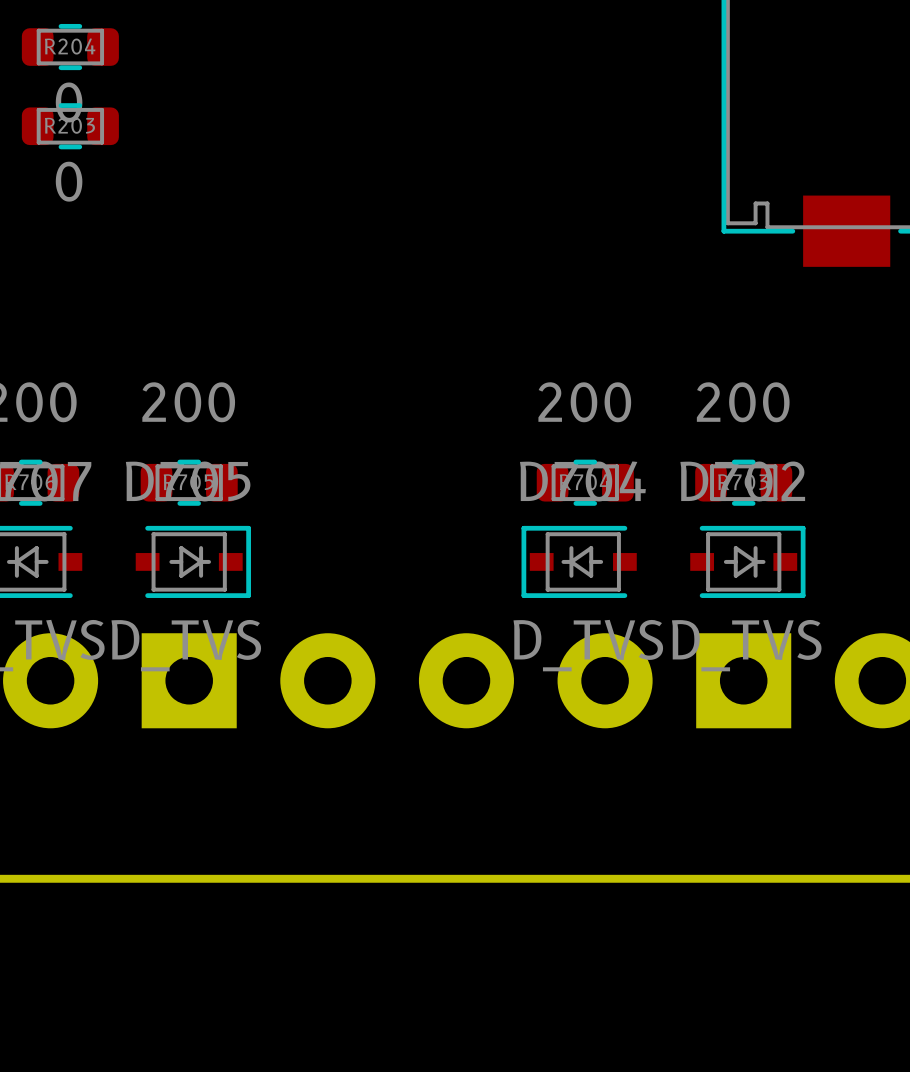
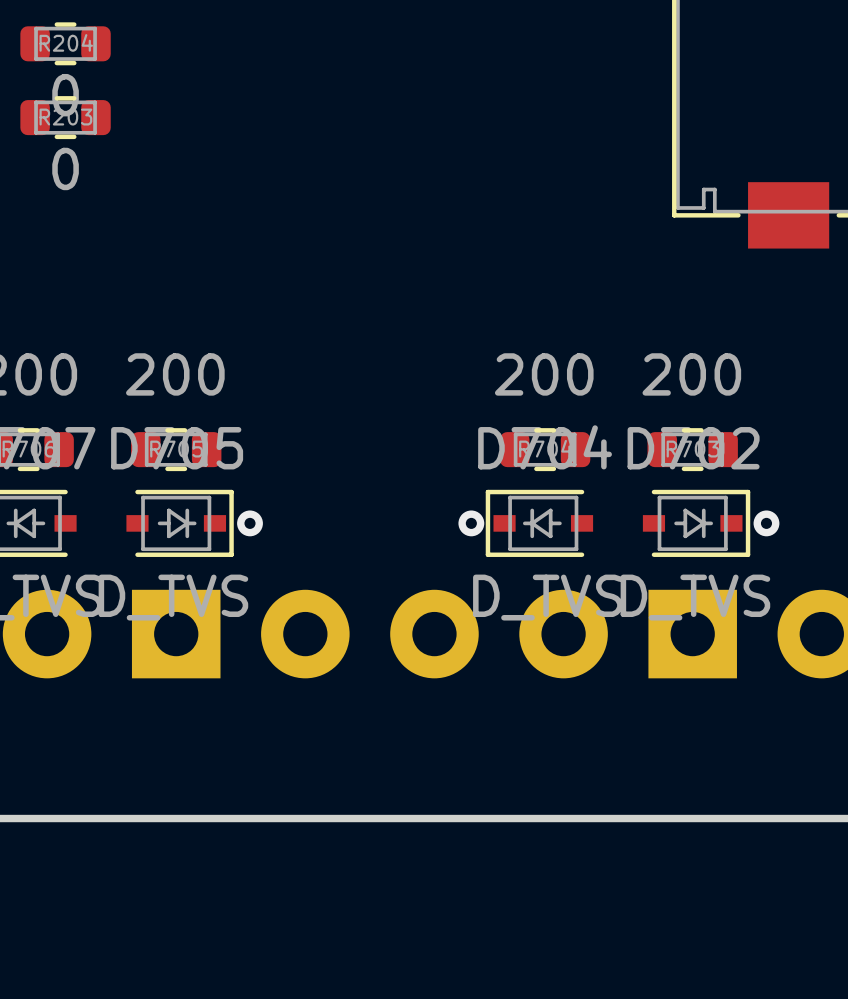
via: none -> (250, 523)
via: none -> (471, 523)
via: none -> (766, 523)

